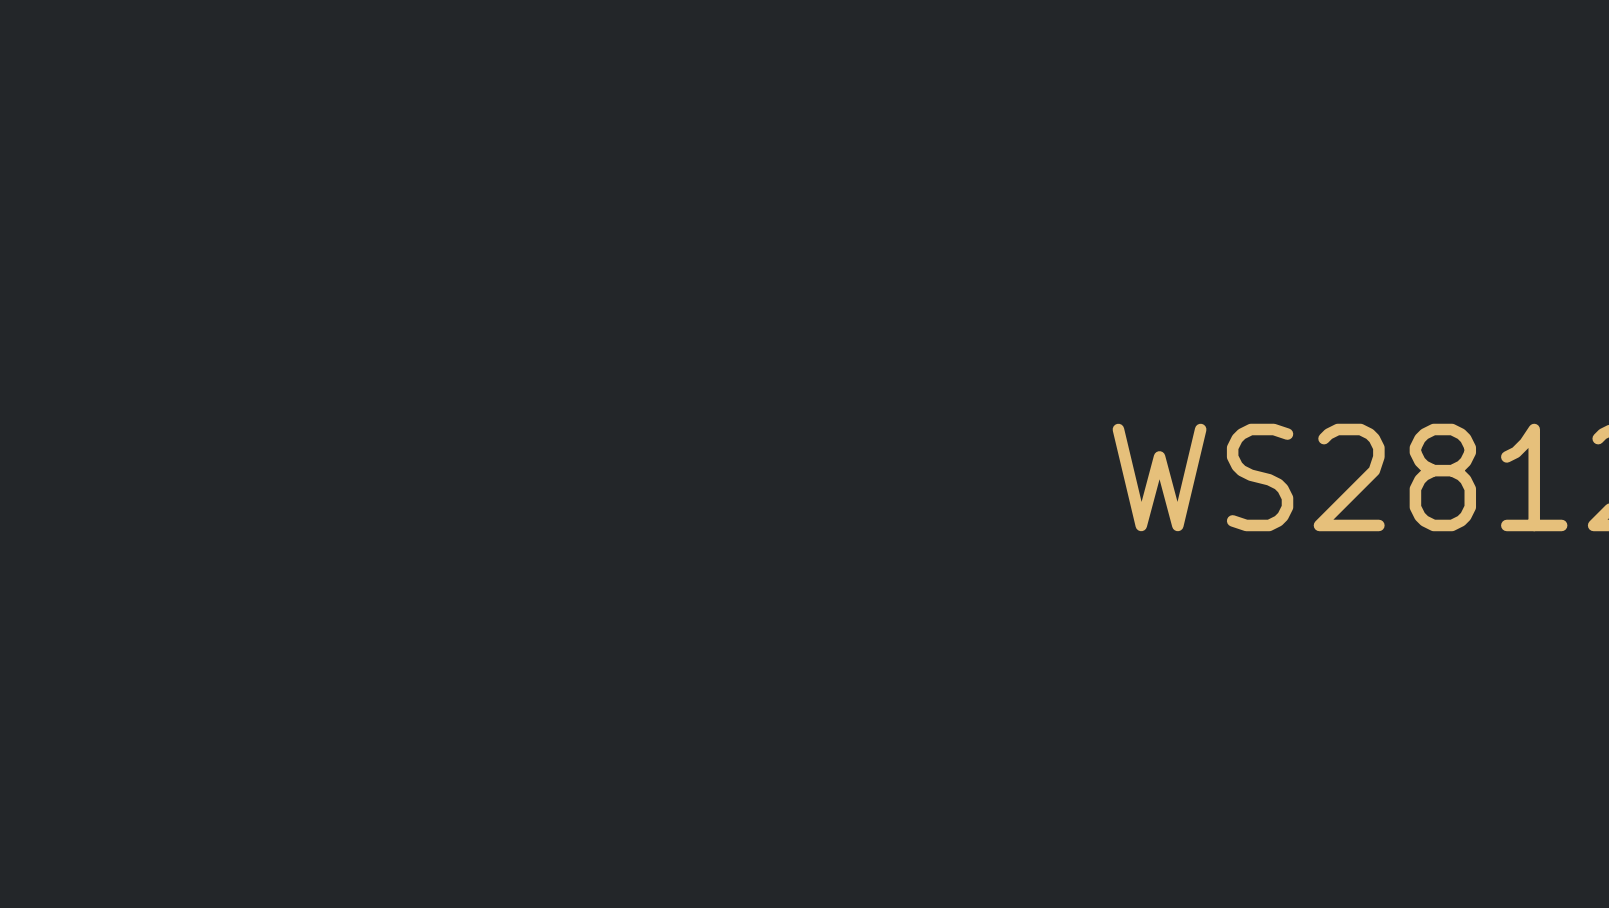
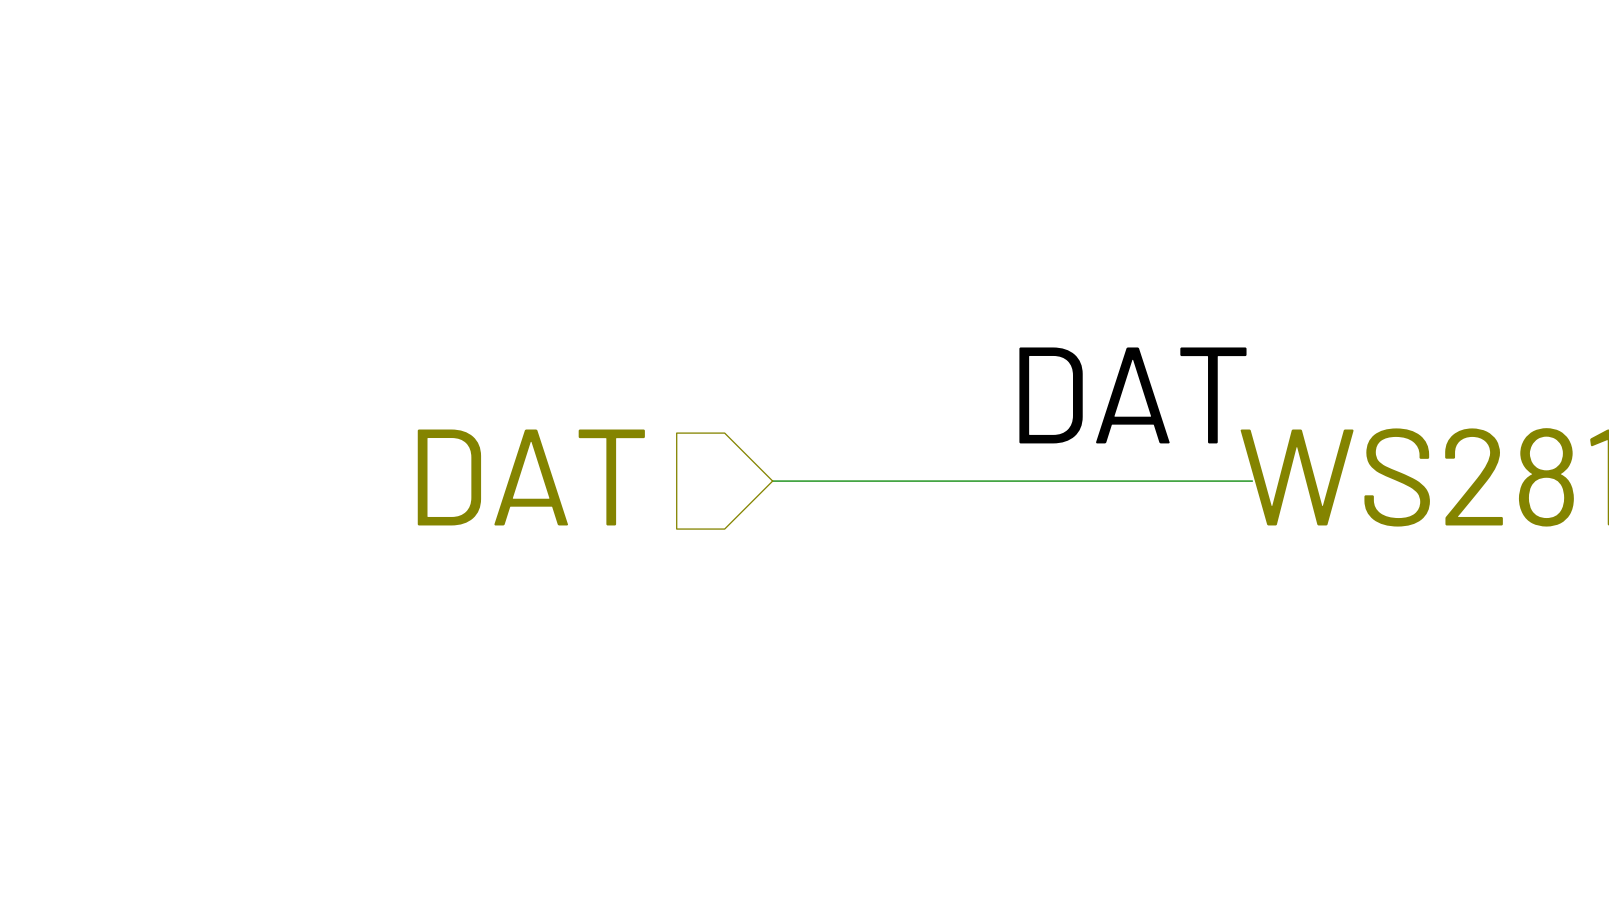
label: none -> DAT (1132, 395)
hierarchical label: none -> DAT (531, 477)
wire: none -> (772, 481) (1252, 481)

